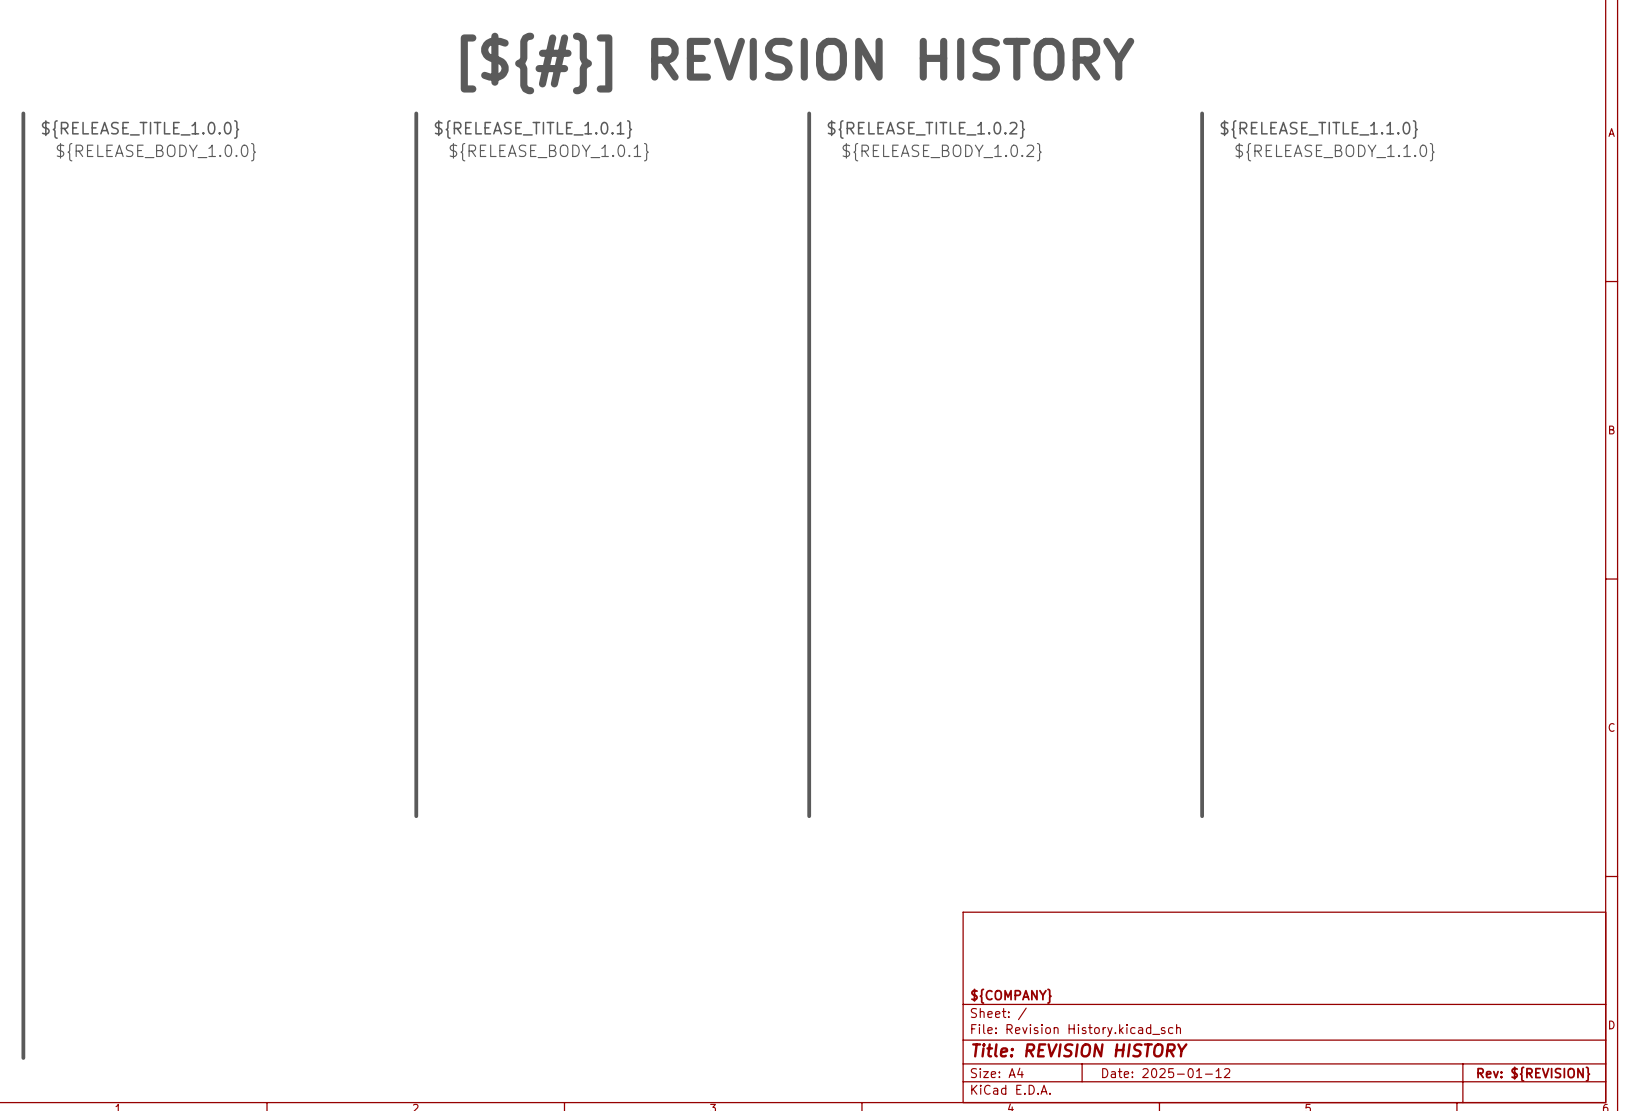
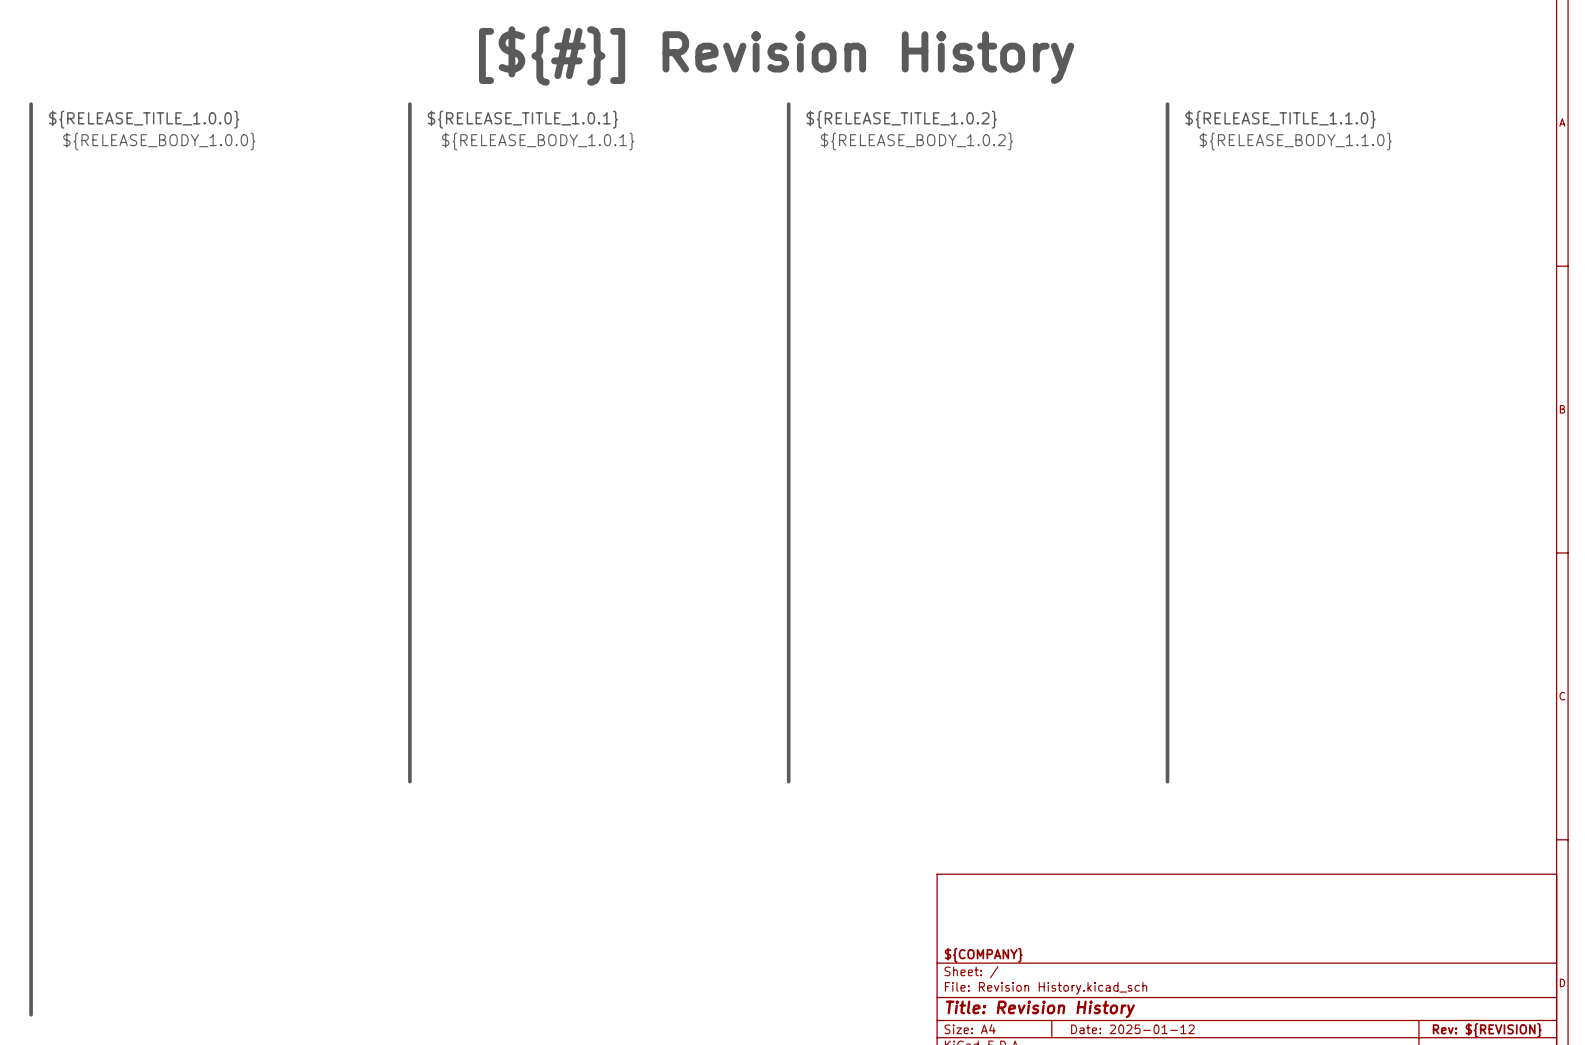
text: [${#}] REVISION HISTORY (797, 63) -> [${#}] Revision History (776, 55)
title block: Title: REVISION HISTORY (1079, 1050) -> Title: Revision History (1040, 1009)

